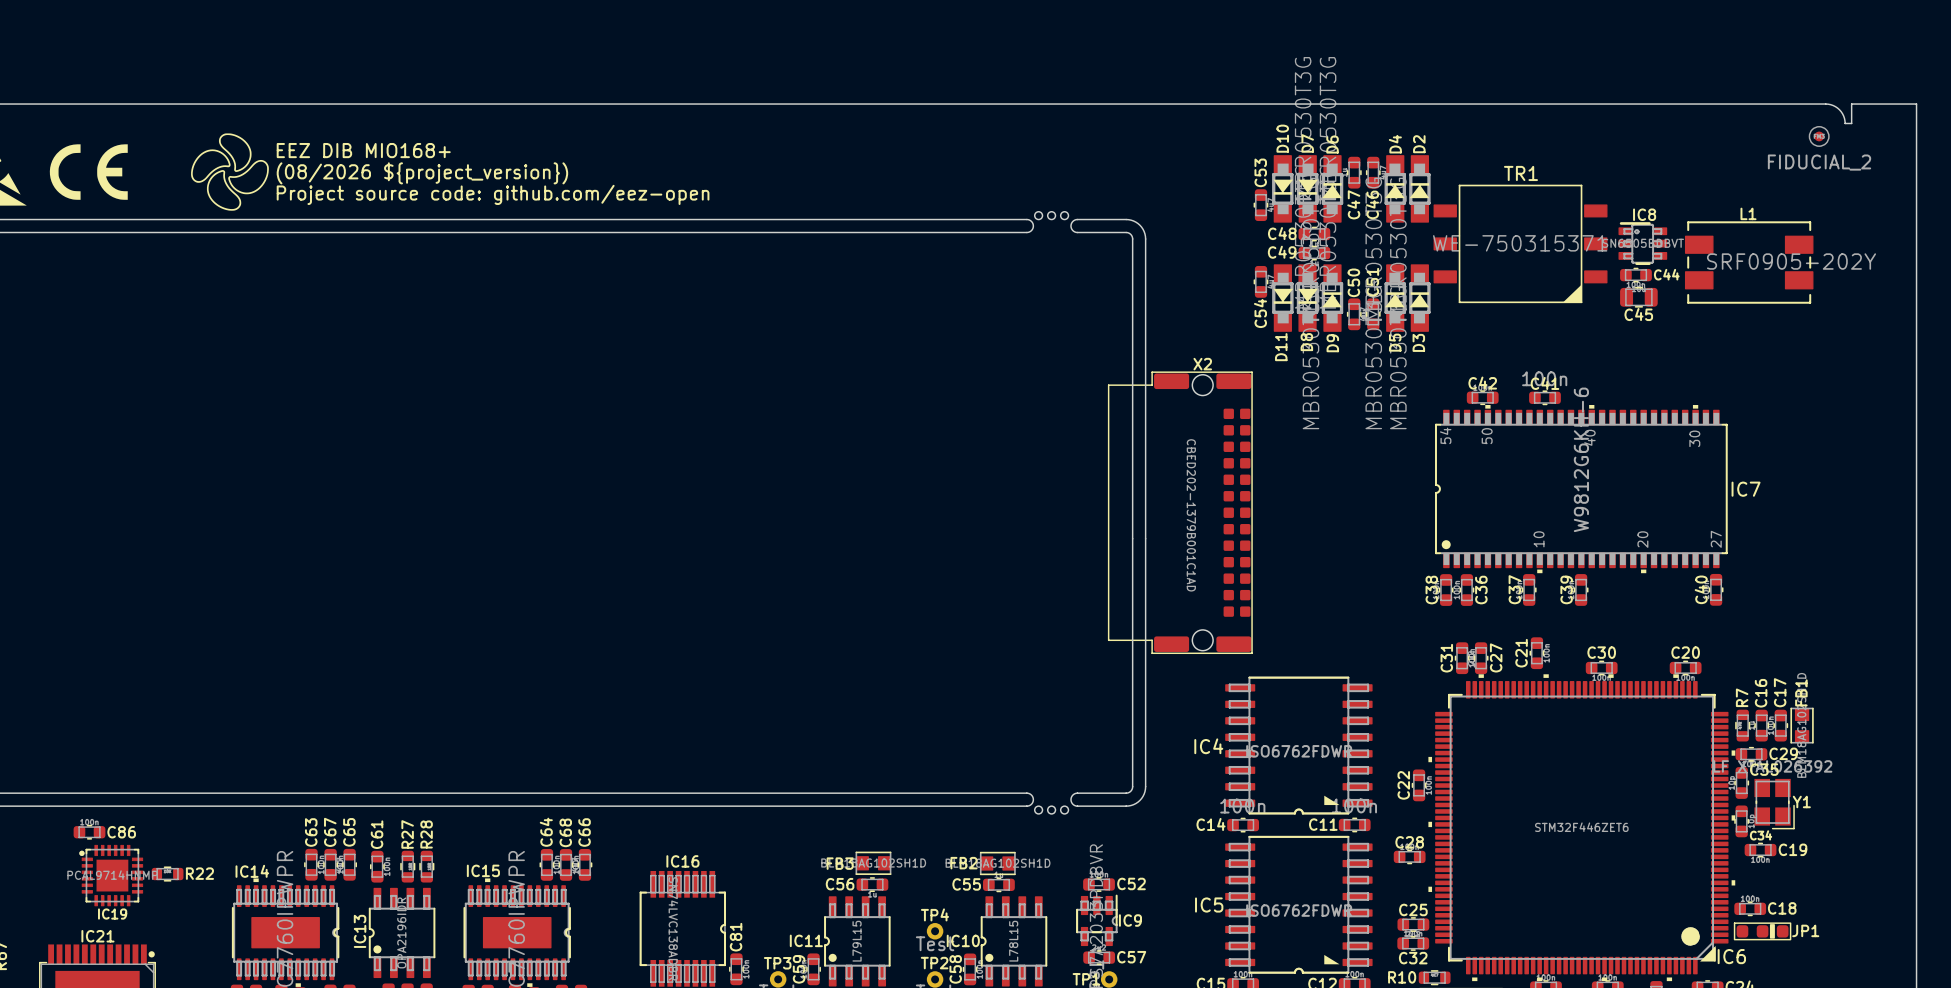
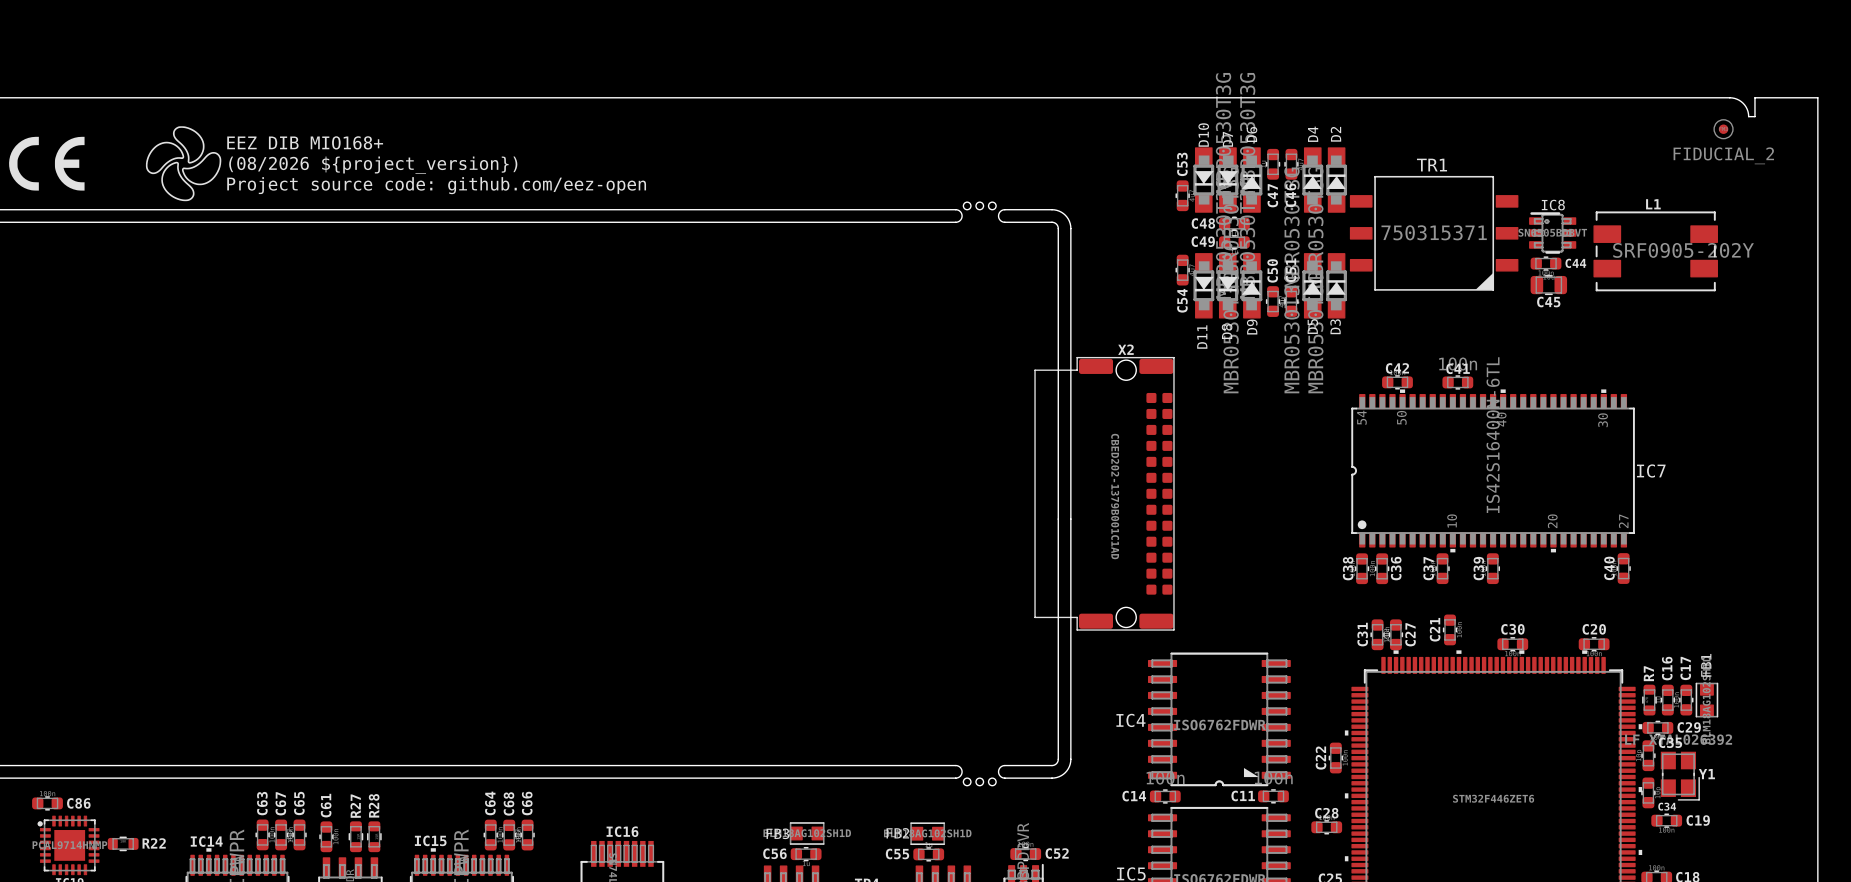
TR1 value: WE-750315371 (1520, 243) -> 750315371 (1434, 232)
IC7 value: W9812G6KH-6 (1581, 459) -> IS42S16400N-6TL (1493, 435)

